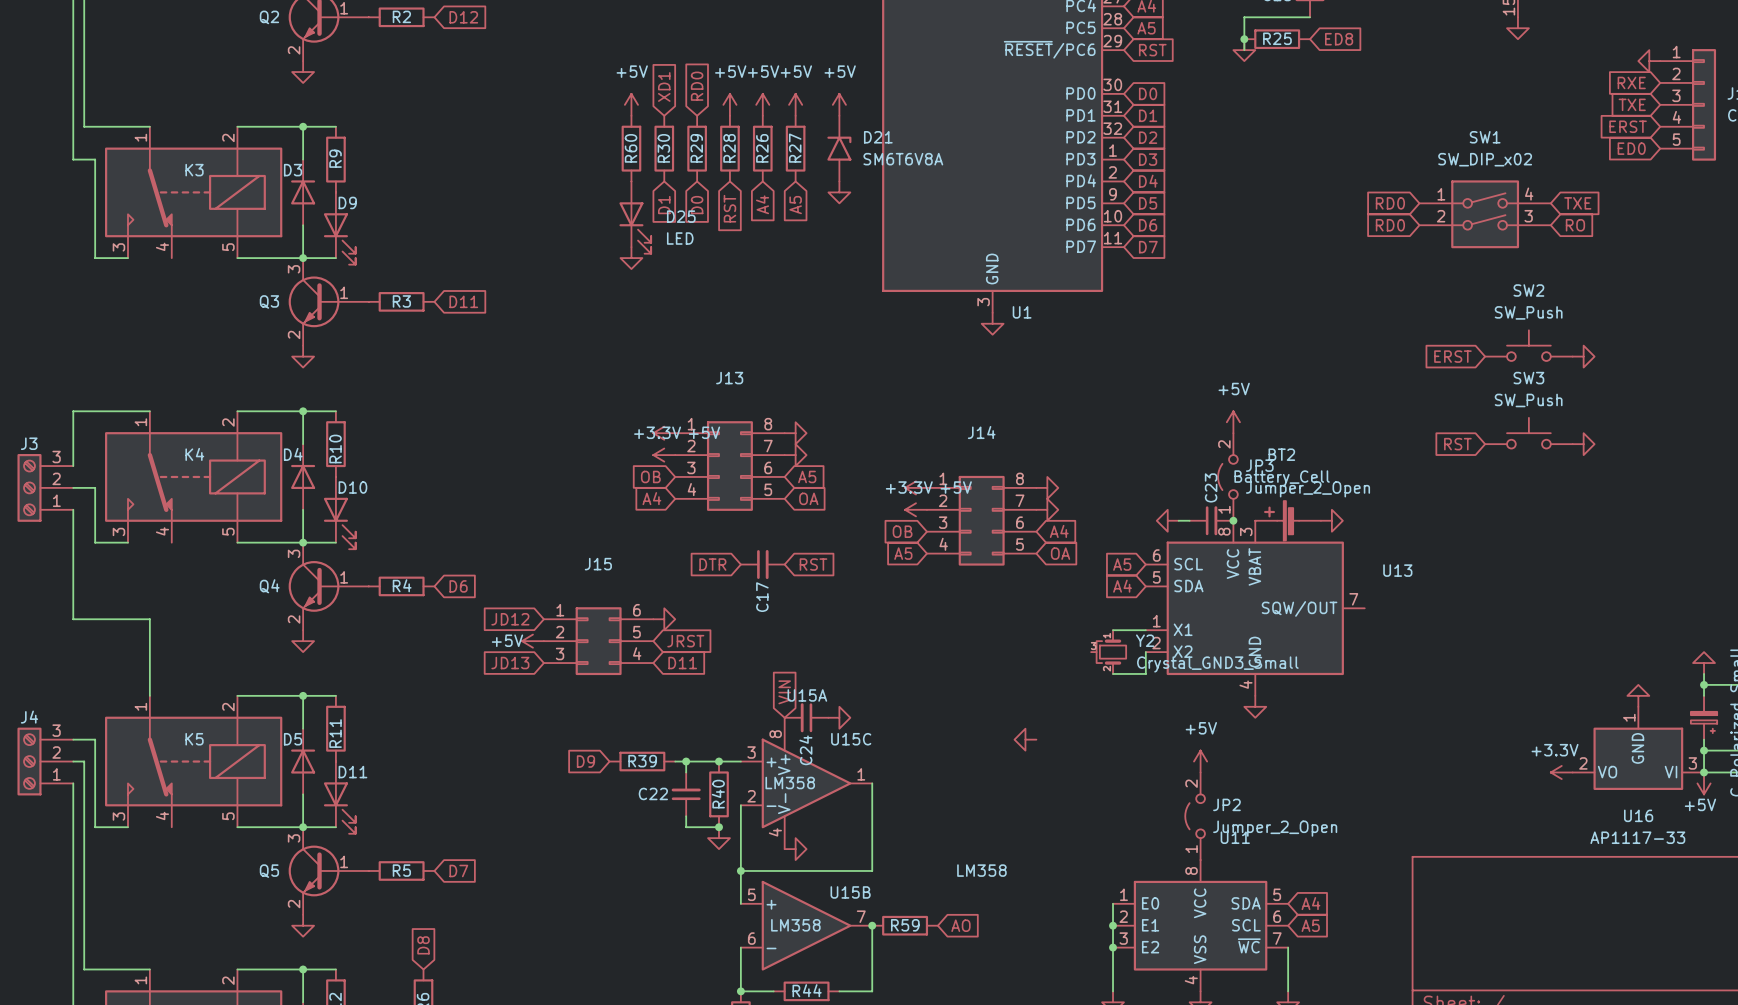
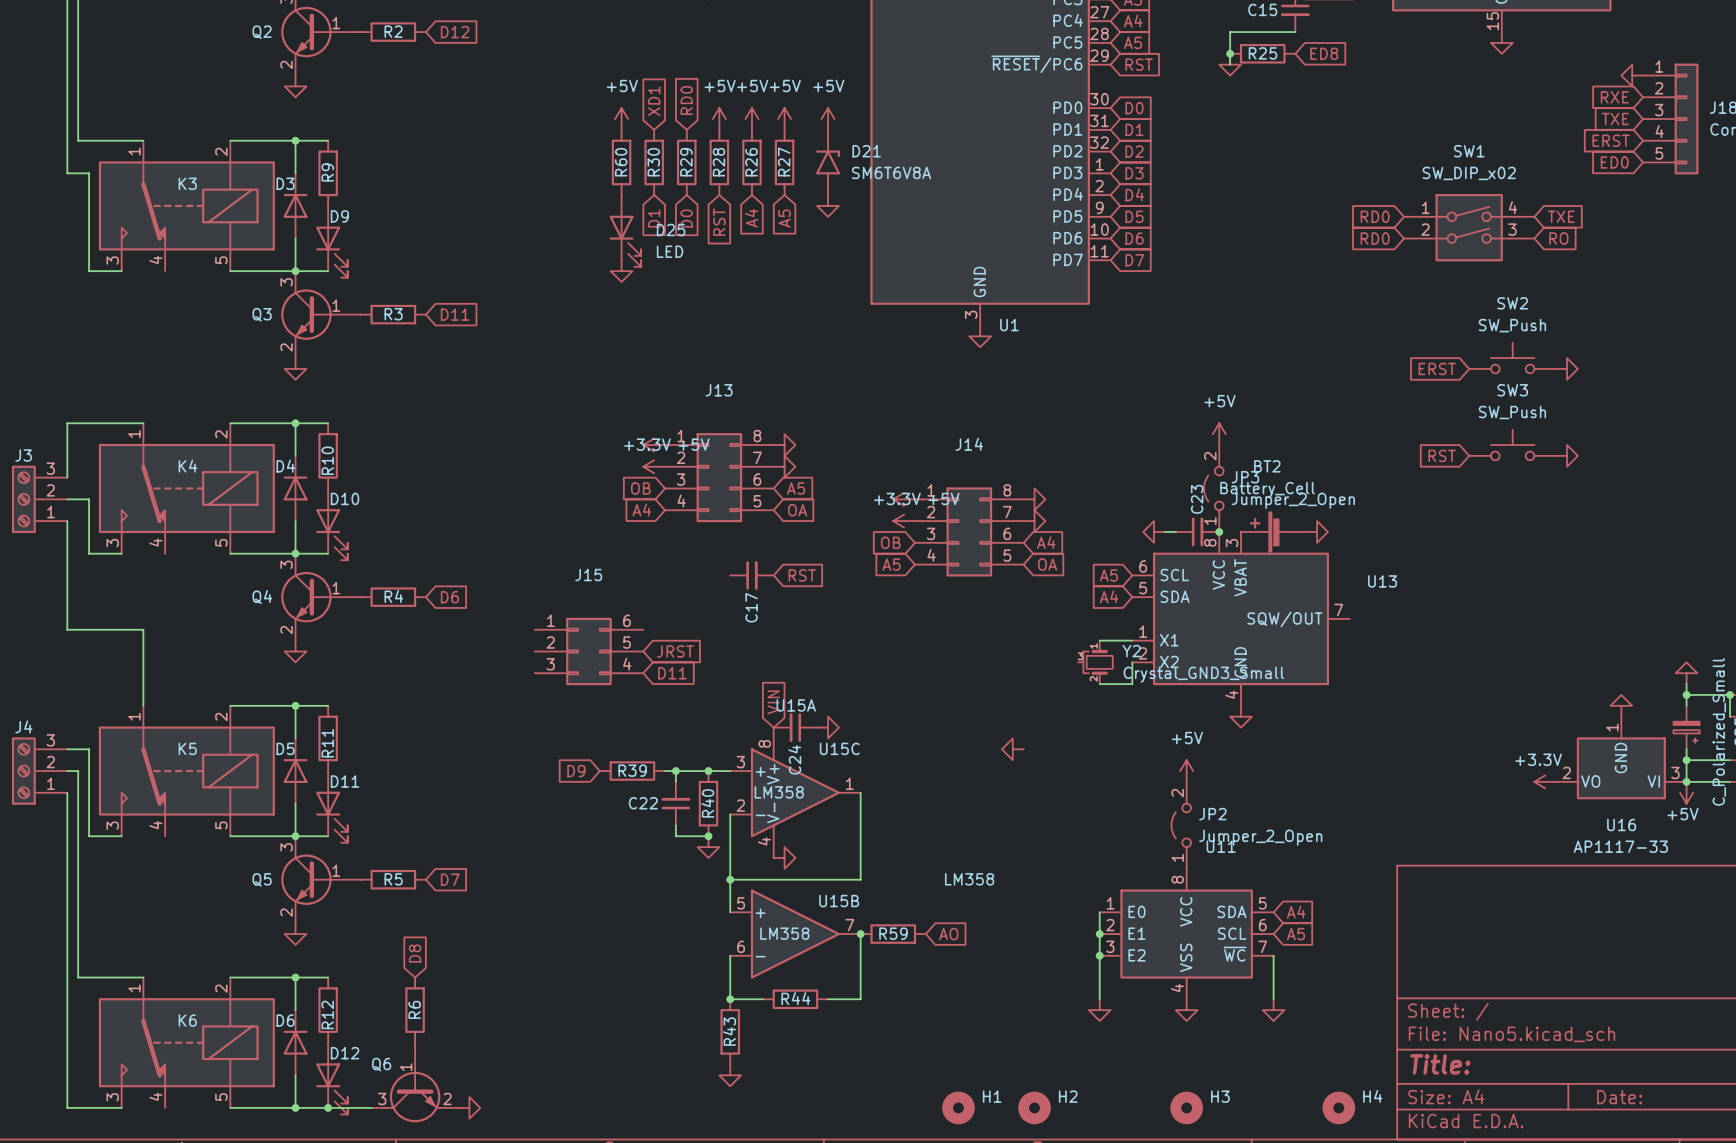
global label: DTR (712, 564) -> none
global label: JD12 (510, 619) -> none
power symbol: (664, 619) -> none
power symbol: +5V (532, 641) -> none
global label: JD13 (510, 663) -> none

